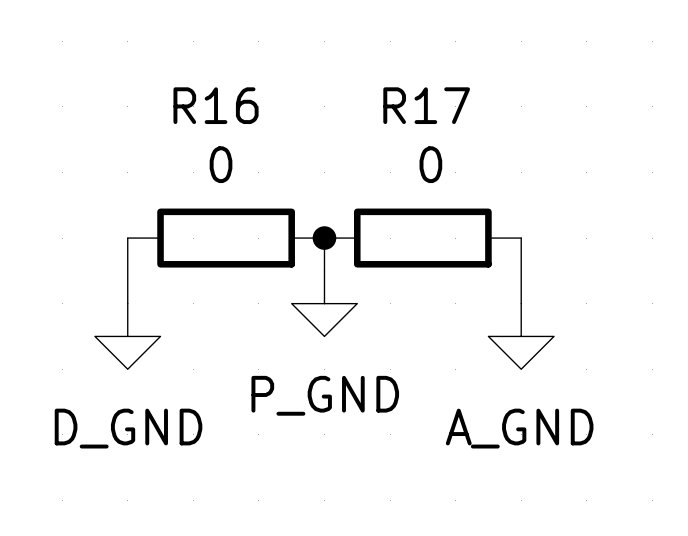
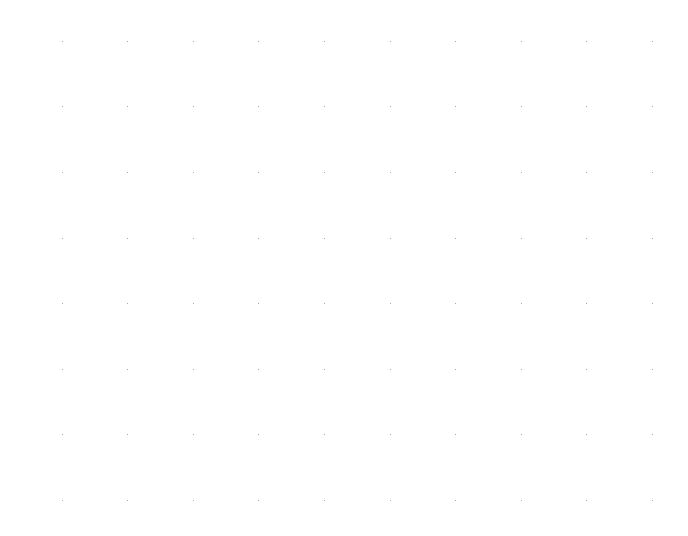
wire: (127, 238) (127, 303) -> none
R16: 0 (226, 238) -> none
wire: (324, 238) (324, 270) -> none
junction: (324, 238) -> none
R17: 0 (422, 238) -> none
wire: (521, 238) (521, 303) -> none
power symbol: P_GND (324, 303) -> none
power symbol: D_GND (127, 336) -> none
power symbol: A_GND (521, 336) -> none

